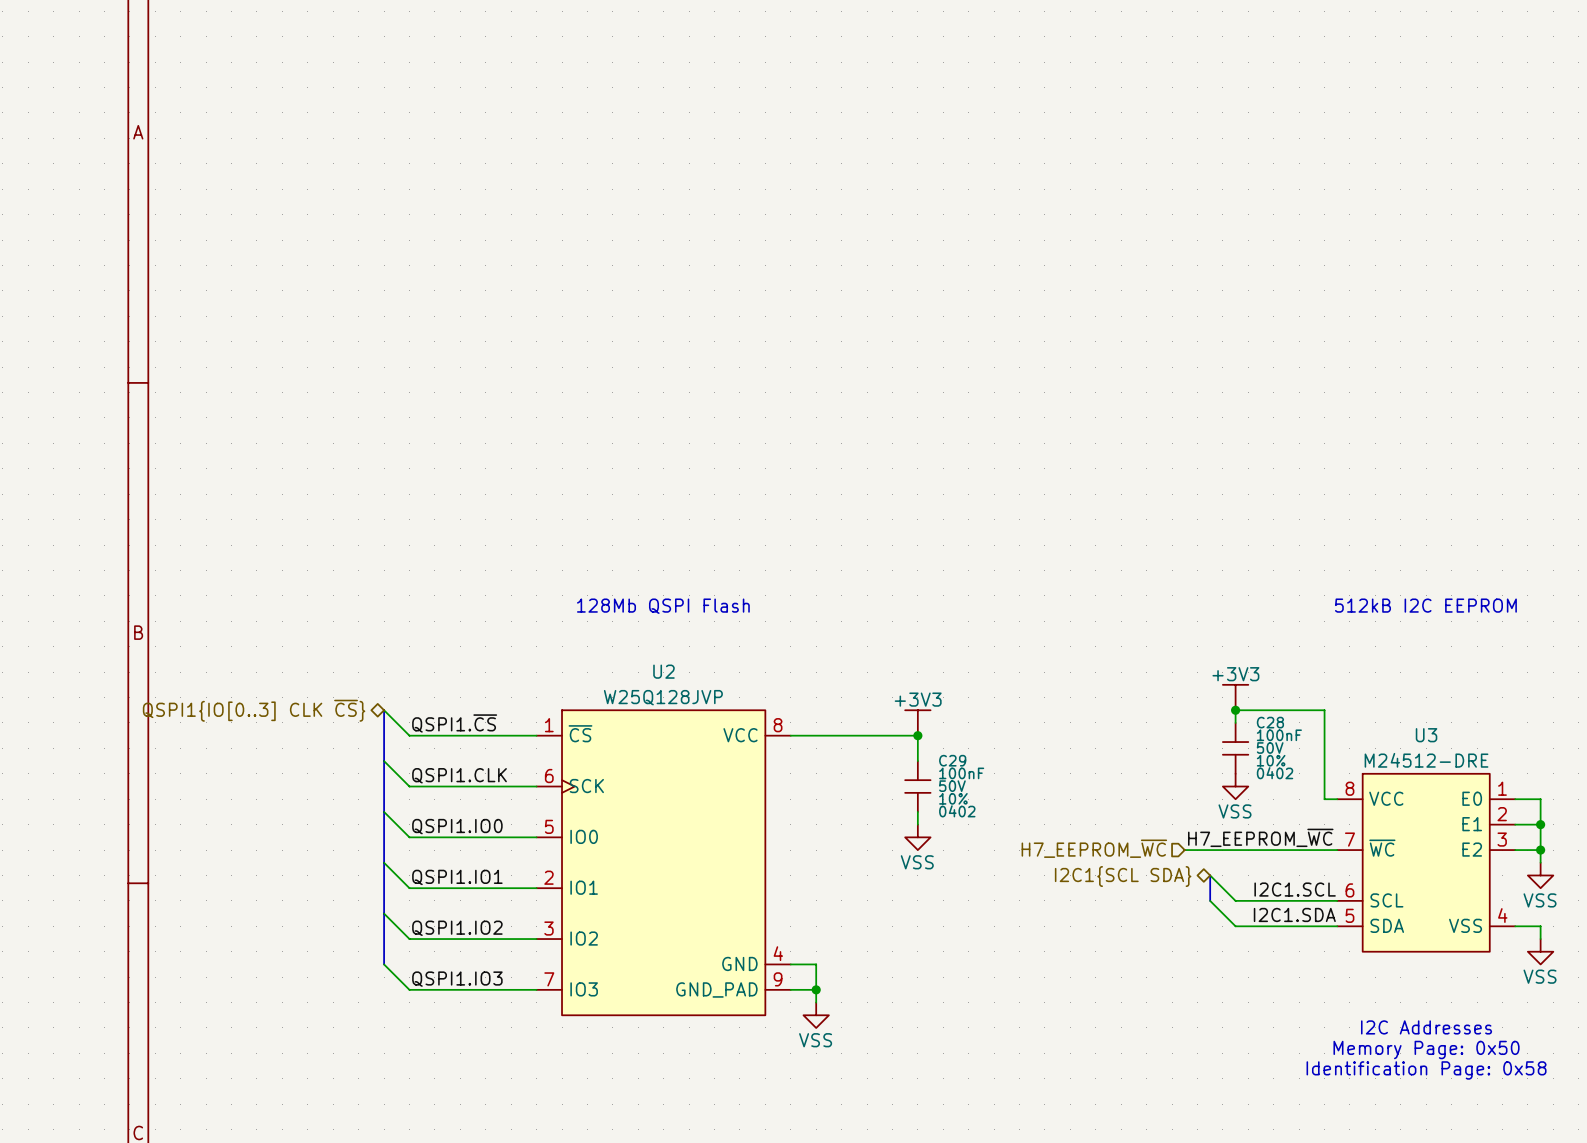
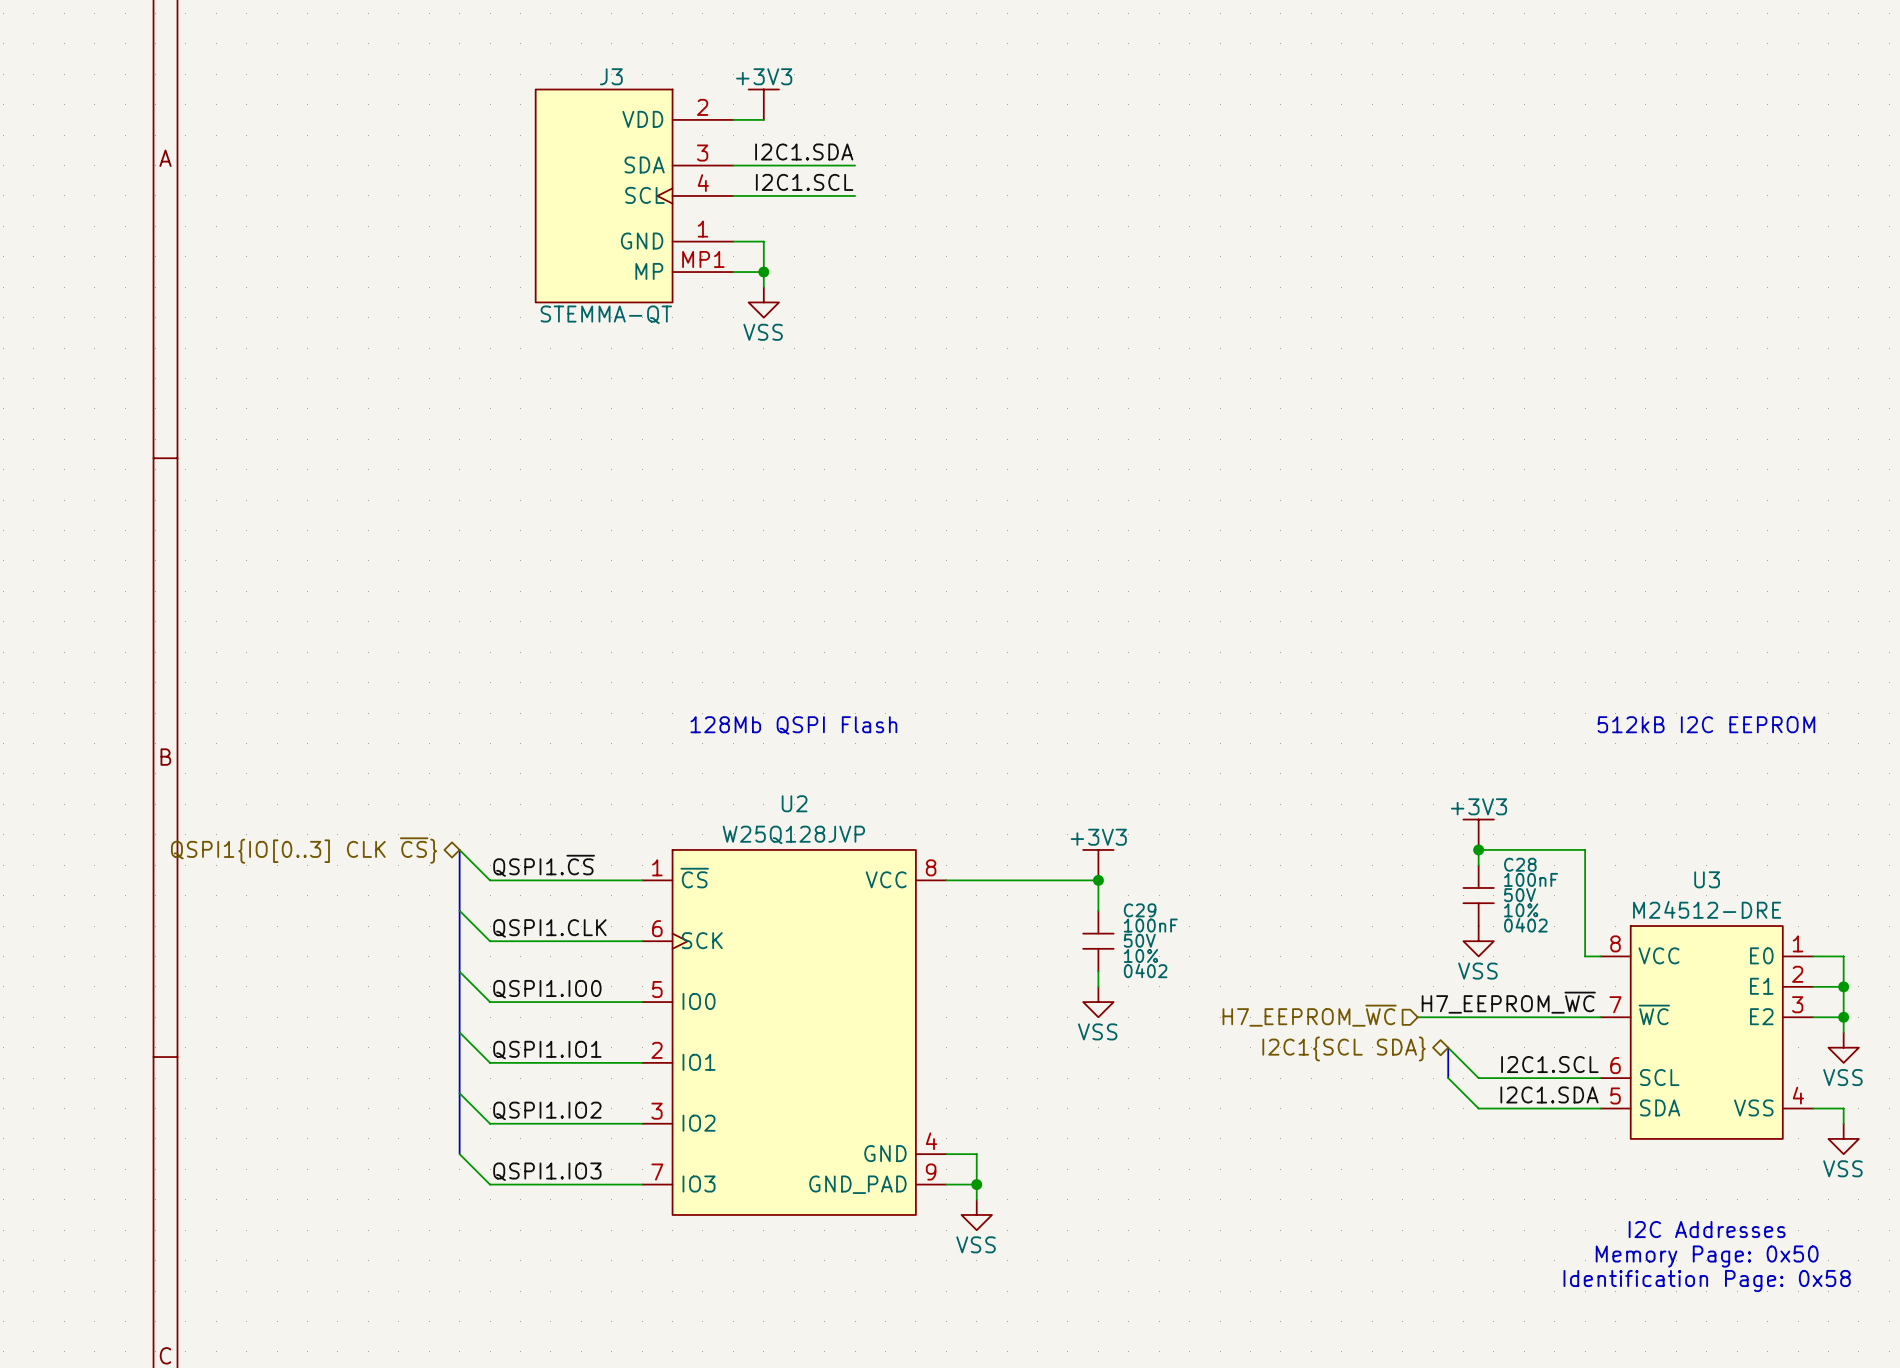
power symbol: none -> +3V3 (763, 104)
wire: none -> (733, 119) (763, 119)
label: none -> I2C1.SDA (804, 151)
wire: none -> (733, 165) (855, 165)
label: none -> I2C1.SCL (804, 182)
J3: none -> STEMMA-QT (634, 195)
wire: none -> (733, 195) (855, 195)
wire: none -> (733, 241) (763, 241) (763, 287)
wire: none -> (733, 272) (763, 272)
junction: none -> (763, 272)
power symbol: none -> VSS (763, 302)

